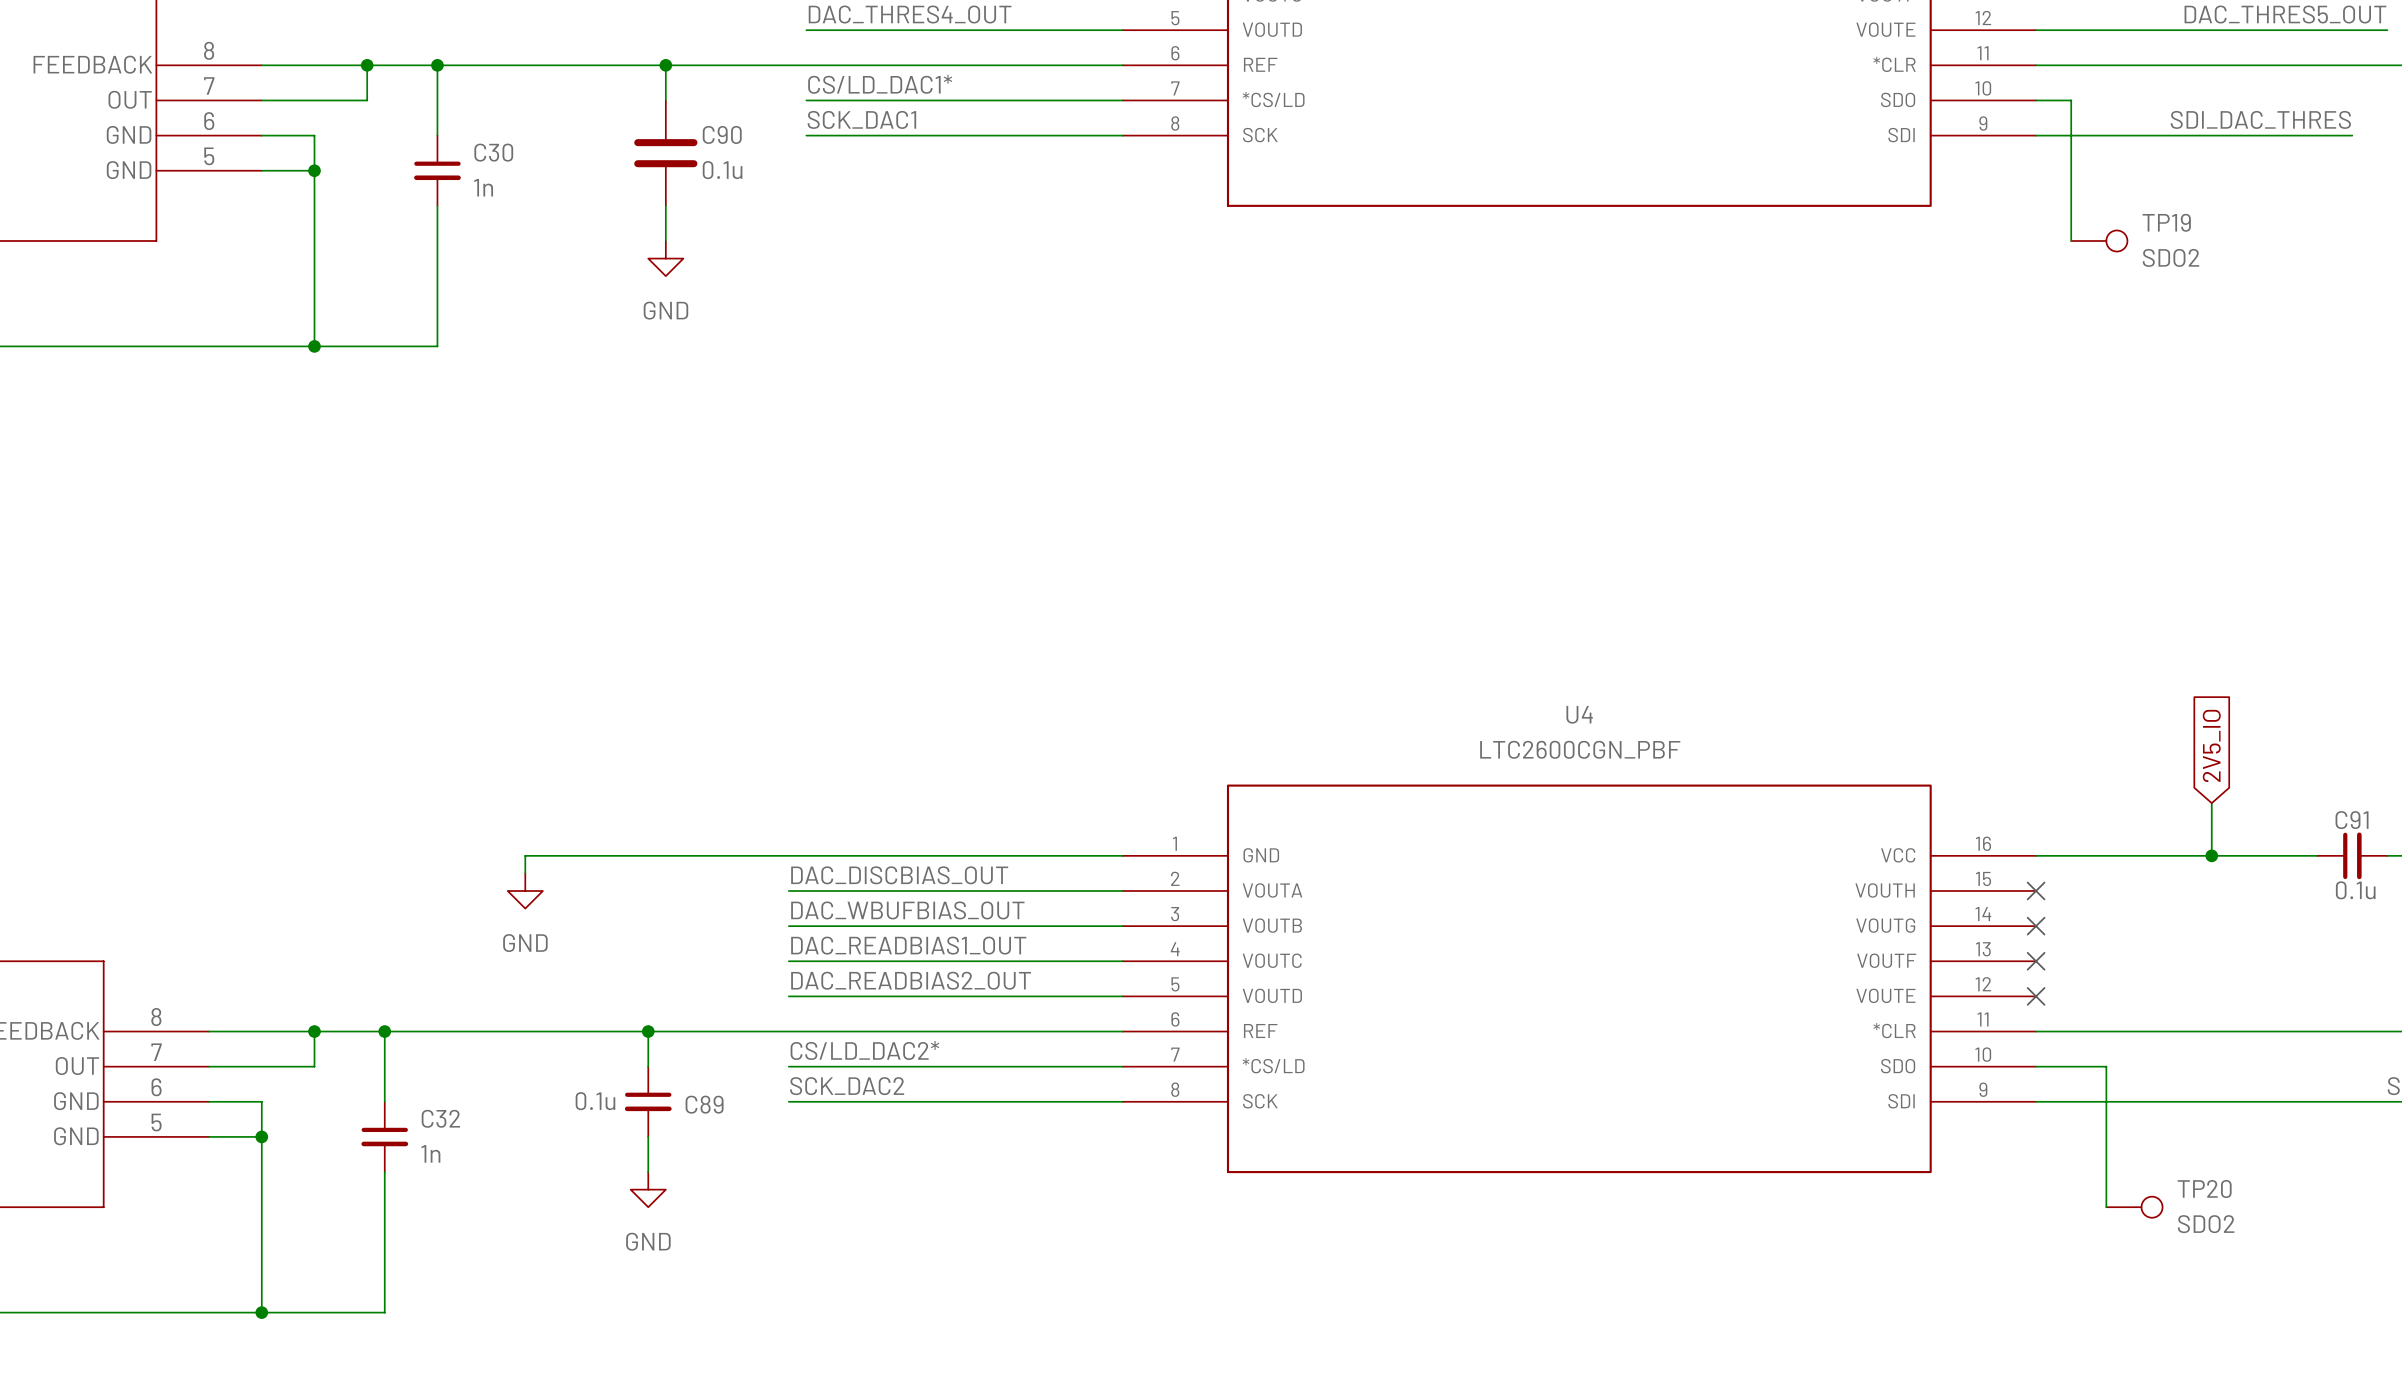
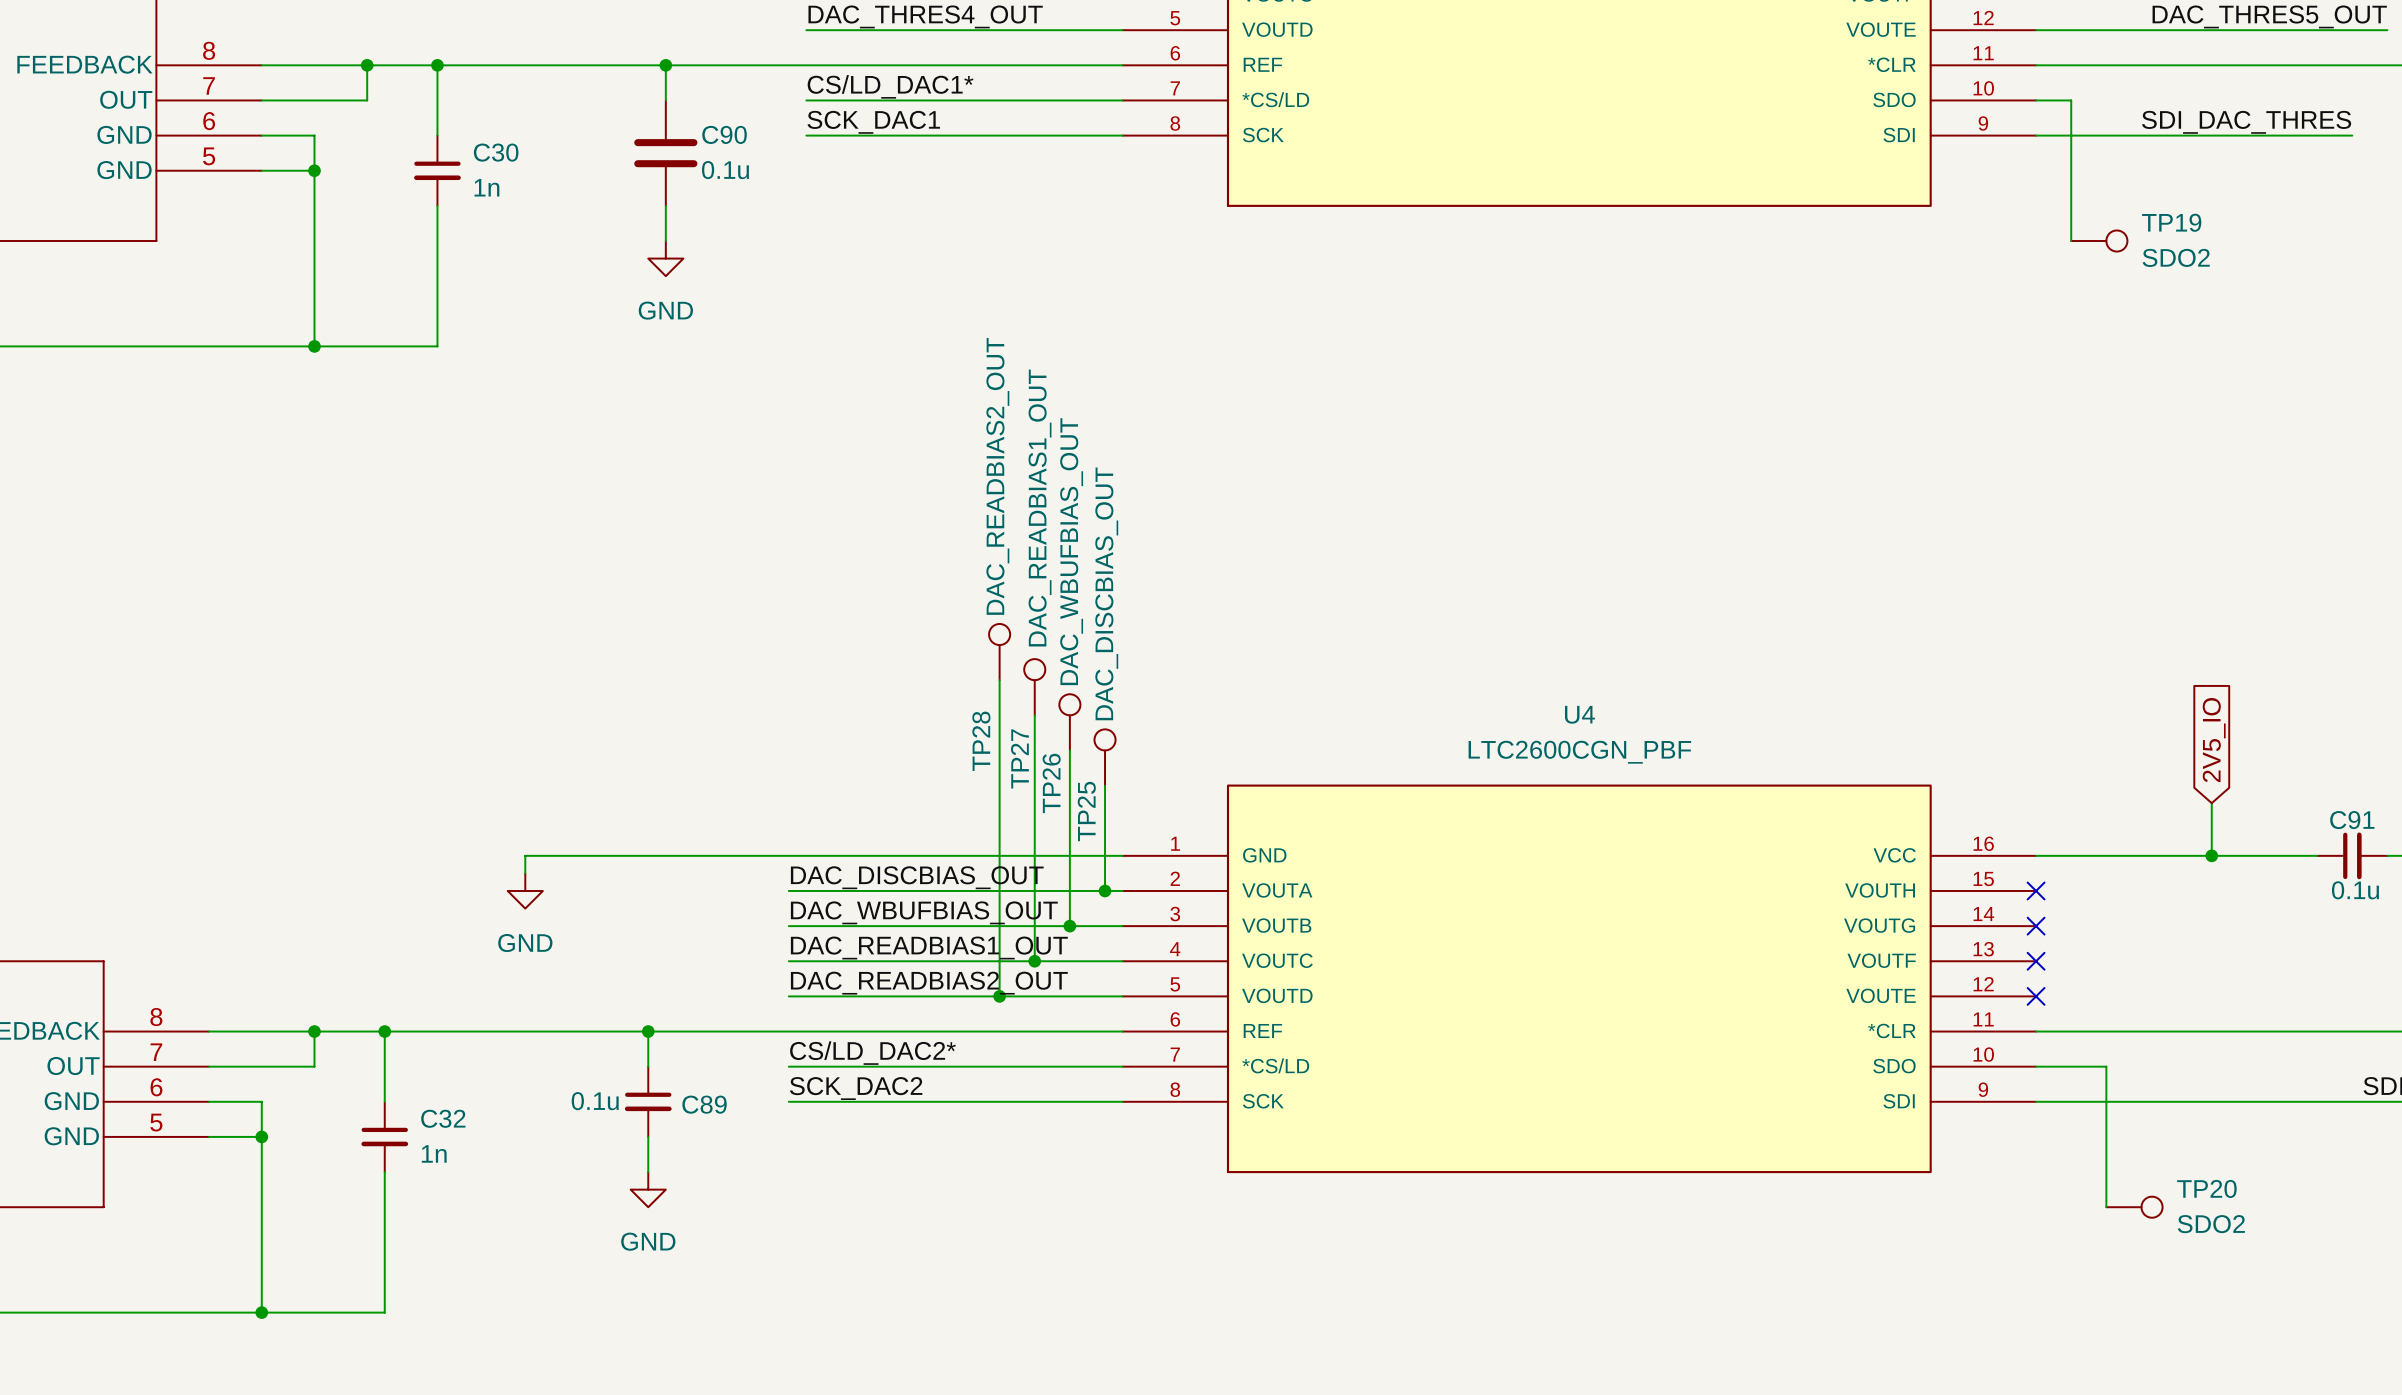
TP28: none -> DAC_READBIAS2_OUT (999, 652)
wire: none -> (999, 680) (999, 996)
TP27: none -> DAC_READBIAS1_OUT (1034, 687)
wire: none -> (1034, 715) (1034, 961)
TP26: none -> DAC_WBUFBIAS_OUT (1069, 722)
wire: none -> (1069, 750) (1069, 926)
TP25: none -> DAC_DISCBIAS_OUT (1105, 757)
wire: none -> (1105, 785) (1105, 890)
junction: none -> (1105, 890)
junction: none -> (1069, 926)
junction: none -> (1034, 961)
junction: none -> (999, 996)

